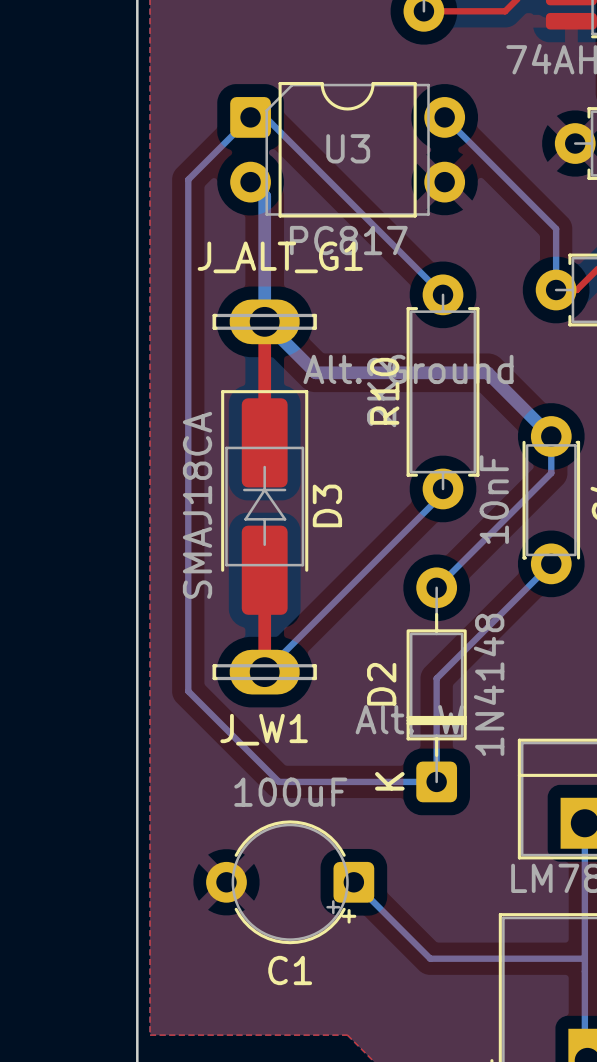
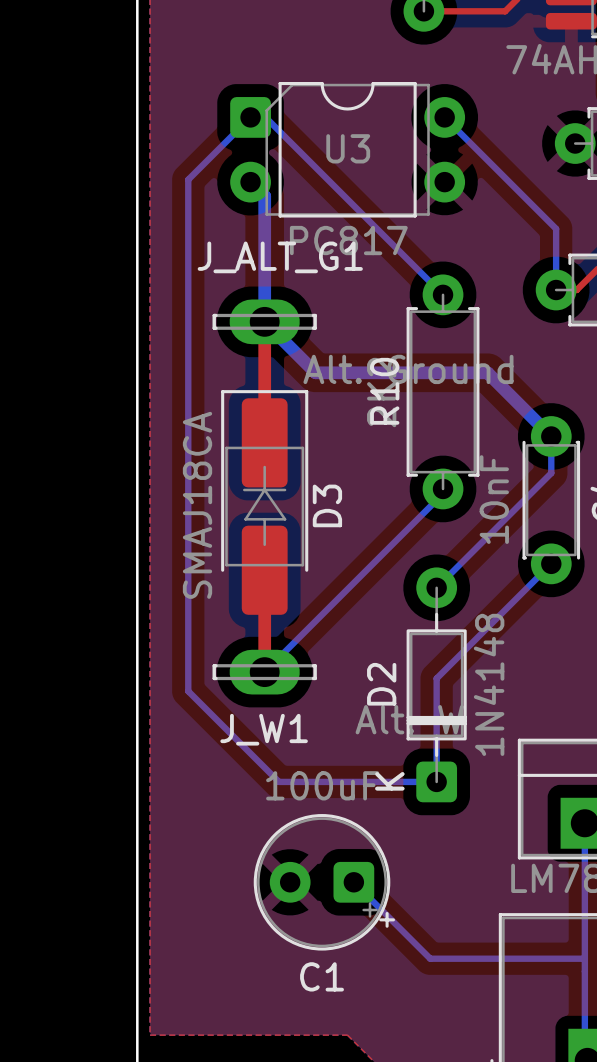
C1 footprint: [206, 820, 375, 945] -> [253, 814, 396, 951]

